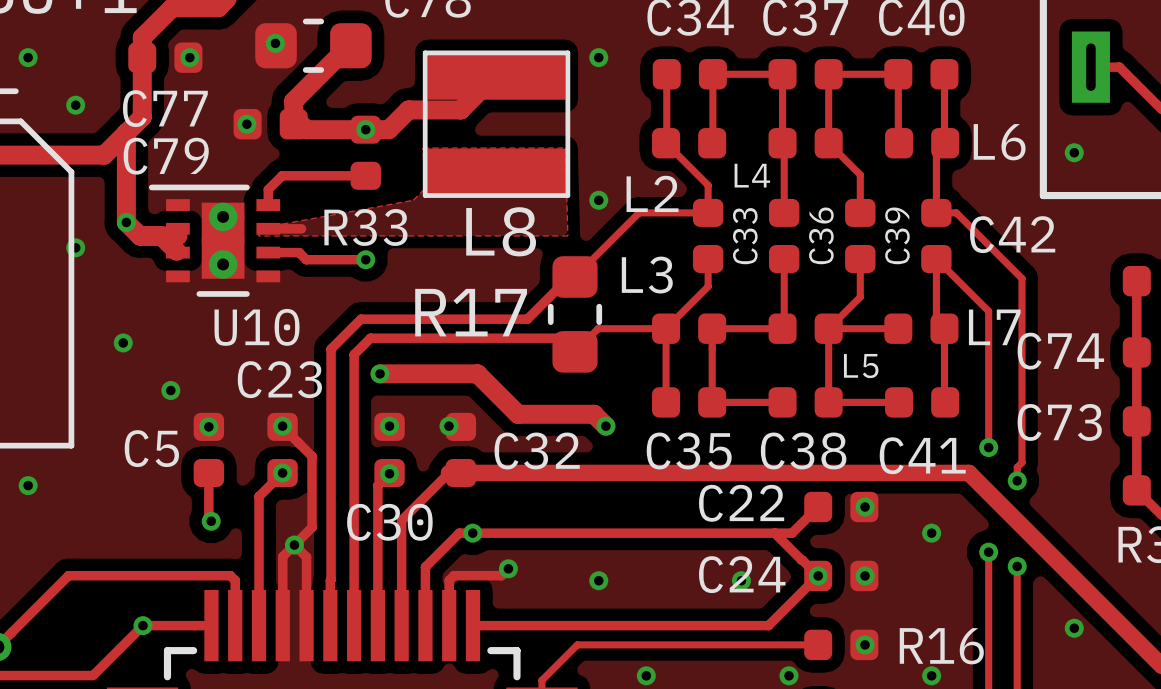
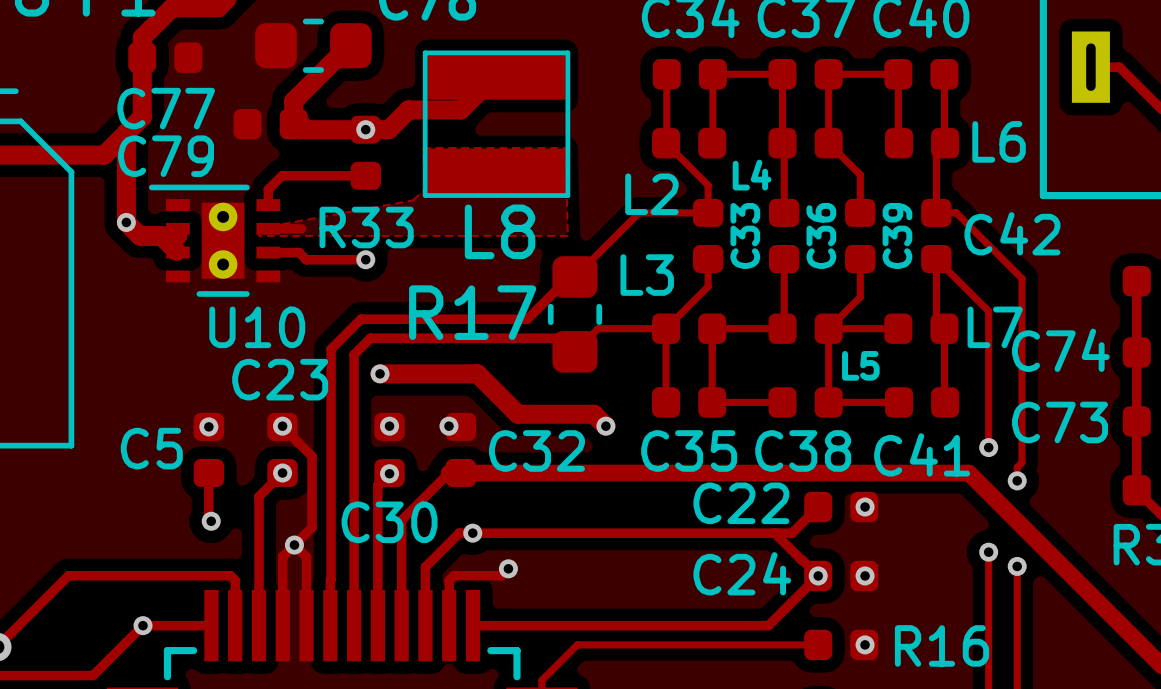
via: (275, 43) -> none
via: (28, 57) -> none
via: (189, 57) -> none
via: (598, 57) -> none
via: (75, 105) -> none
via: (246, 124) -> none
via: (1074, 152) -> none
via: (598, 200) -> none
via: (75, 247) -> none
via: (123, 342) -> none
via: (170, 390) -> none
via: (28, 485) -> none
via: (931, 533) -> none
via: (598, 580) -> none
via: (741, 580) -> none
via: (1074, 628) -> none
via: (646, 675) -> none
via: (788, 675) -> none
via: (931, 675) -> none

